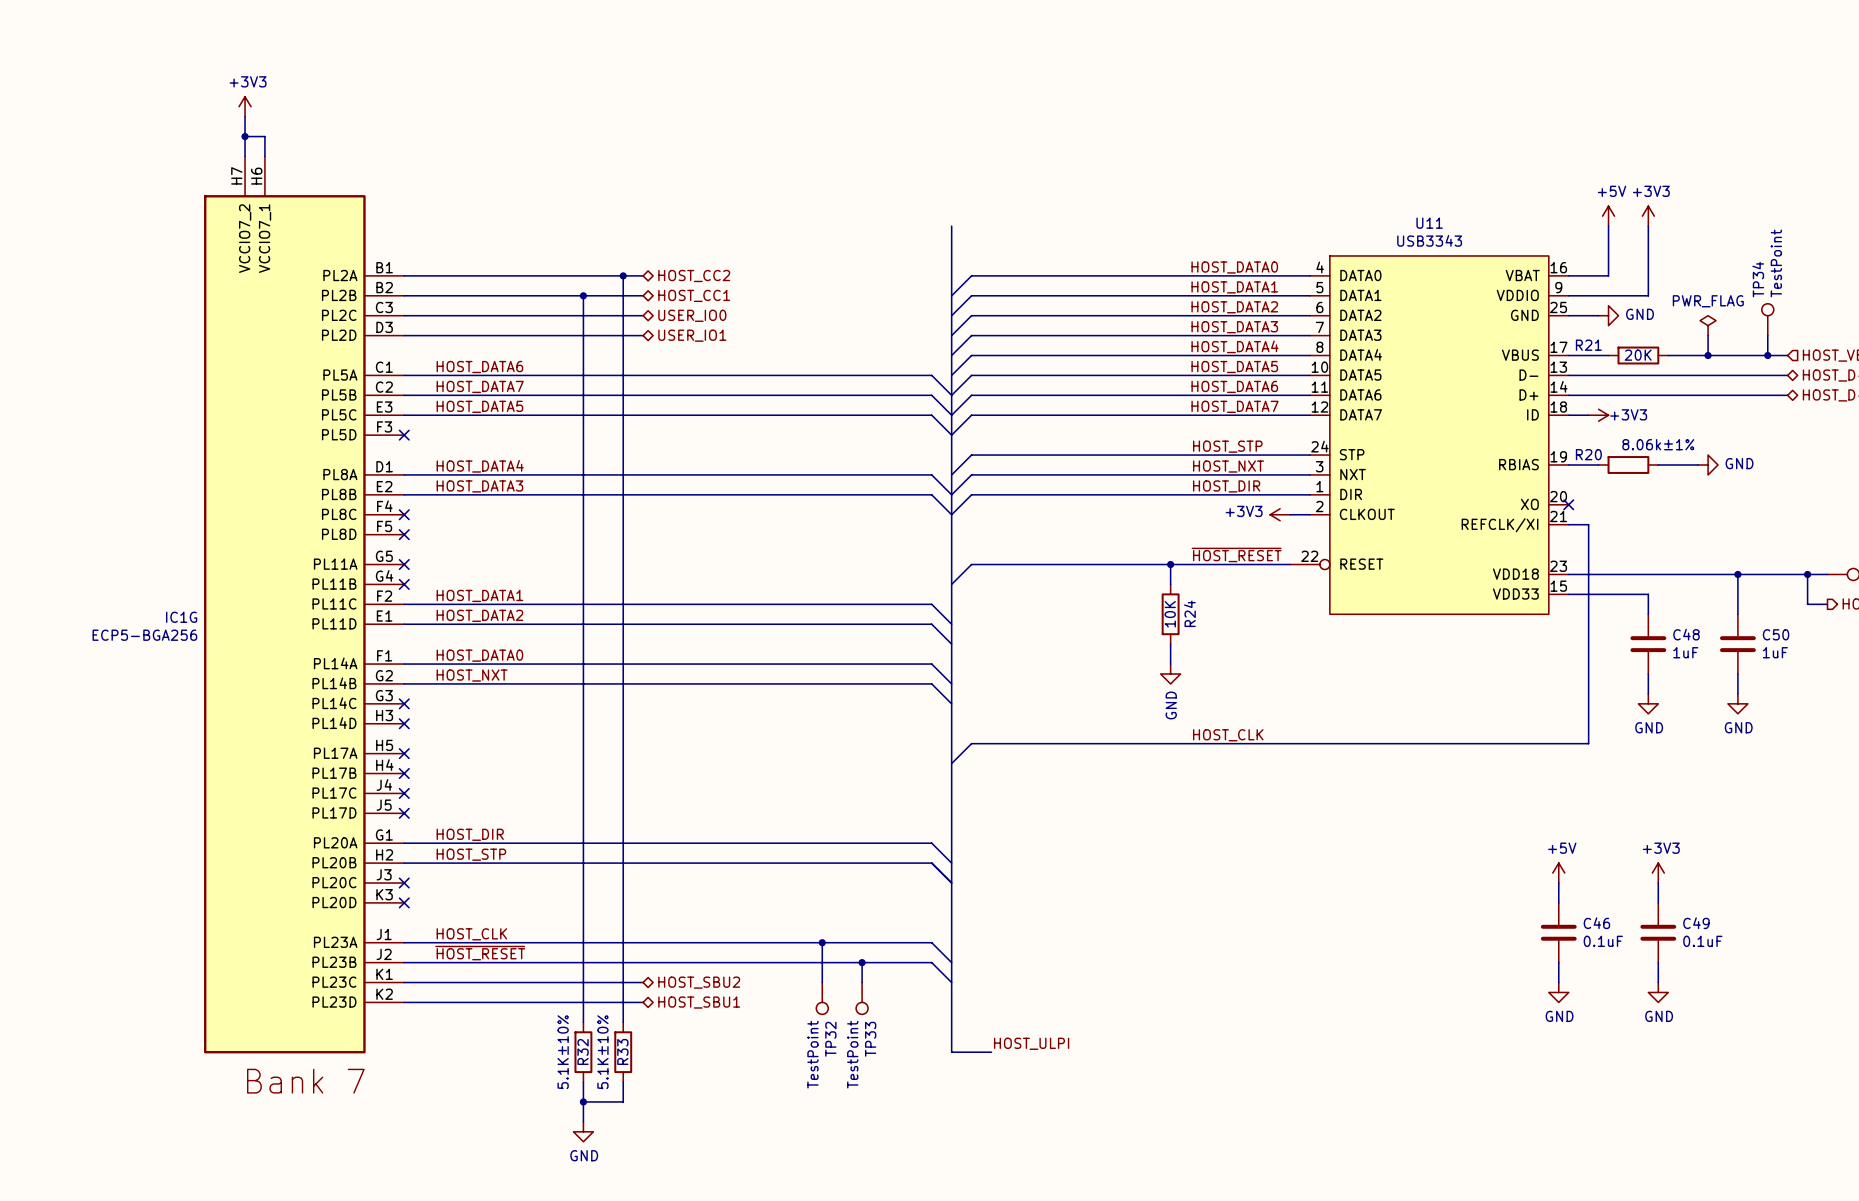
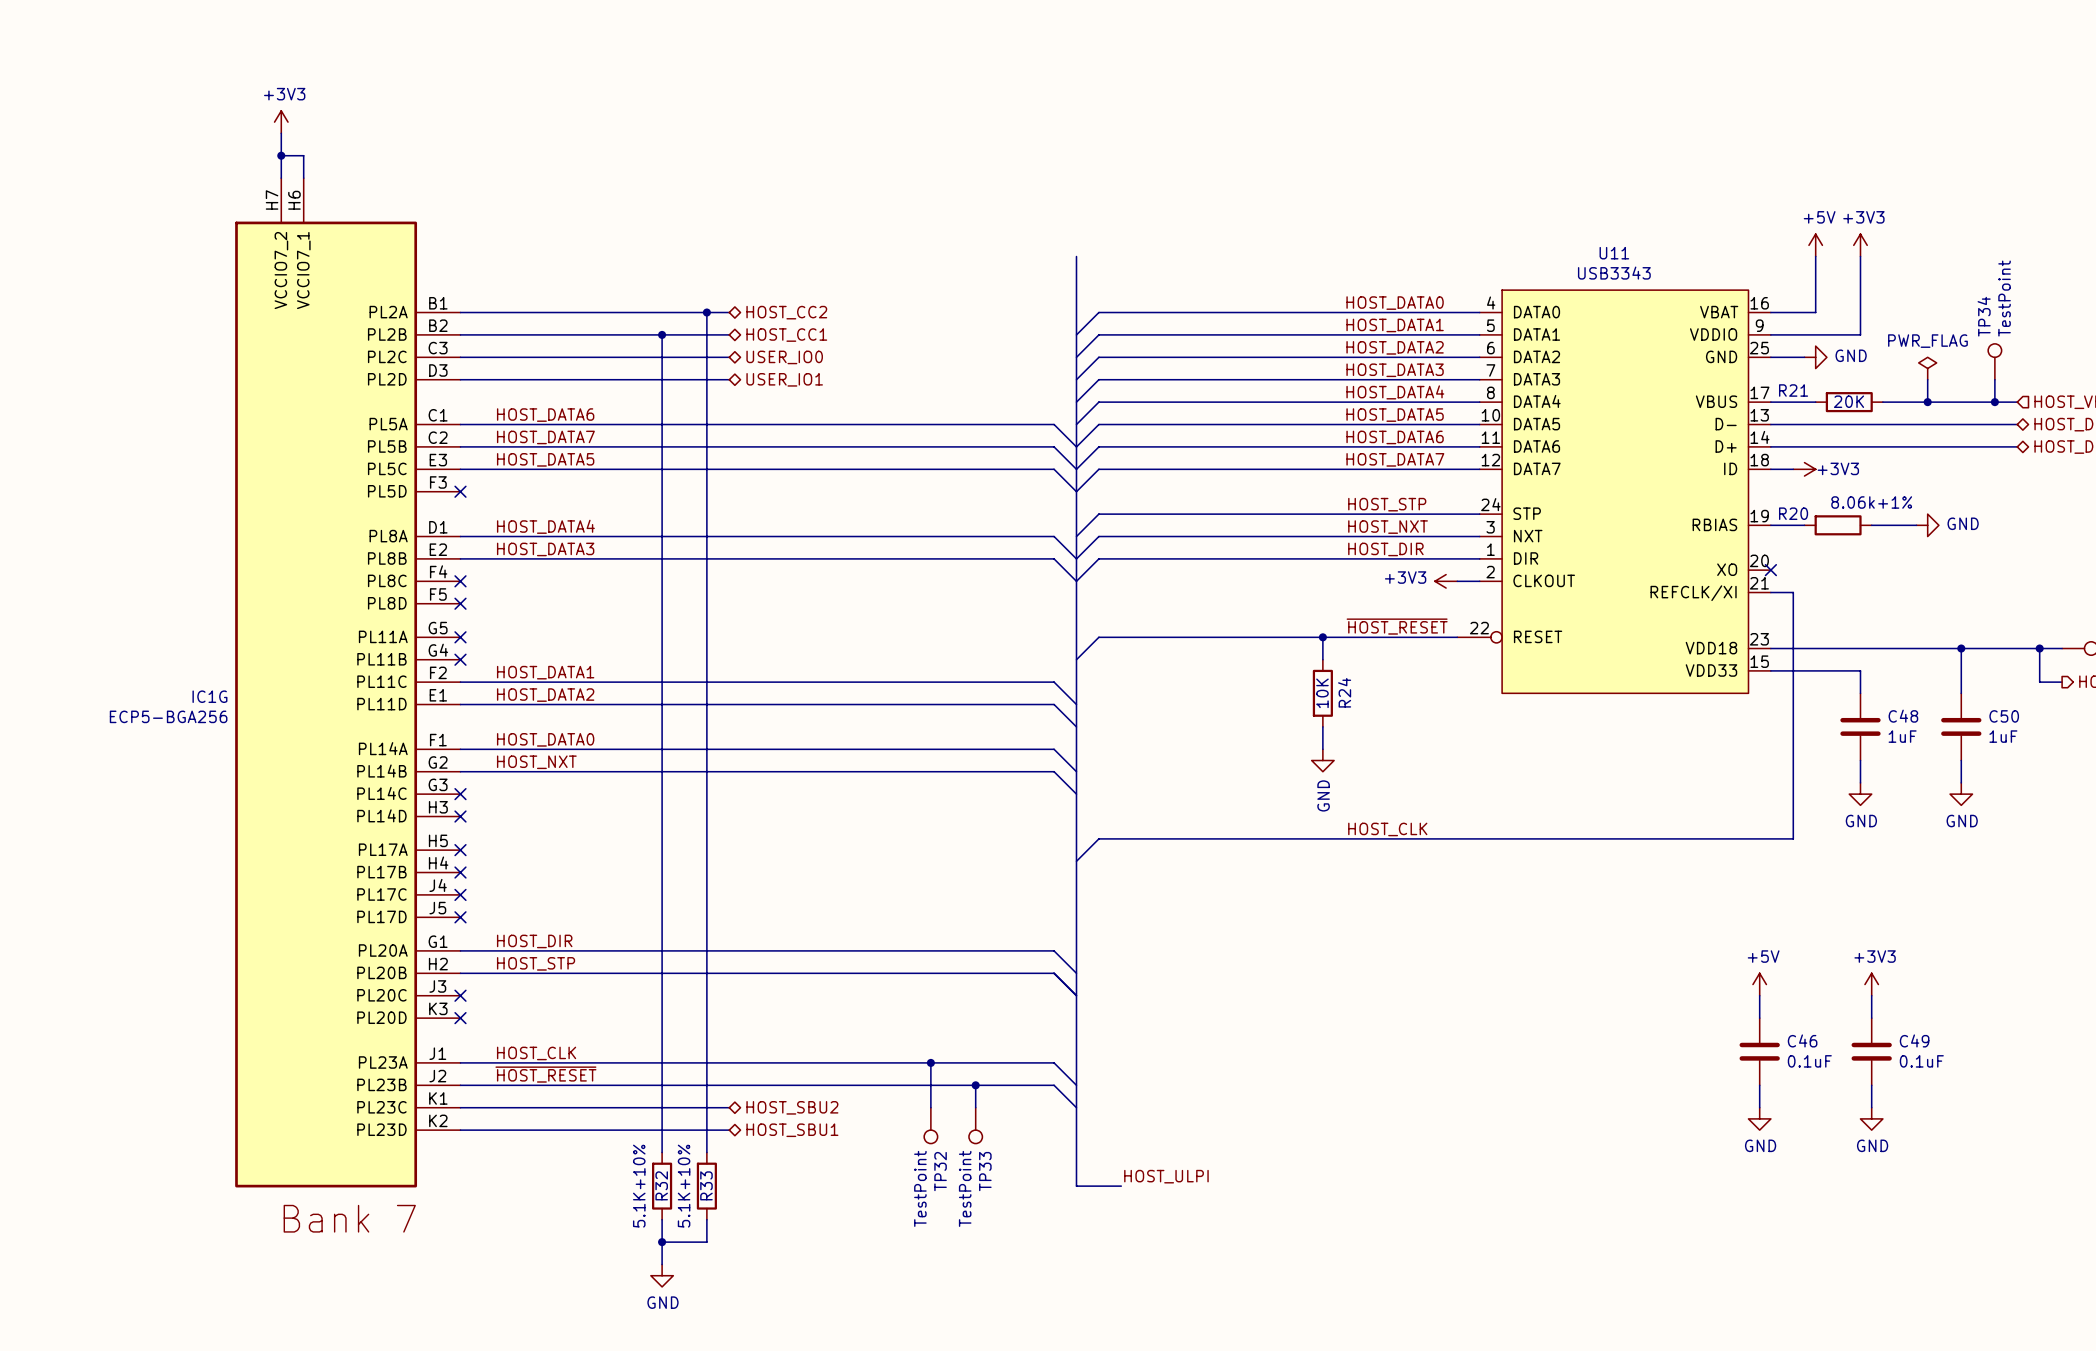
R20 value: 8.06k±1% (1658, 444) -> 8.06k+1% (1871, 502)
R32 value: 5.1K±10% (563, 1052) -> 5.1K+10% (639, 1186)
R33 value: 5.1K±10% (602, 1052) -> 5.1K+10% (684, 1186)

